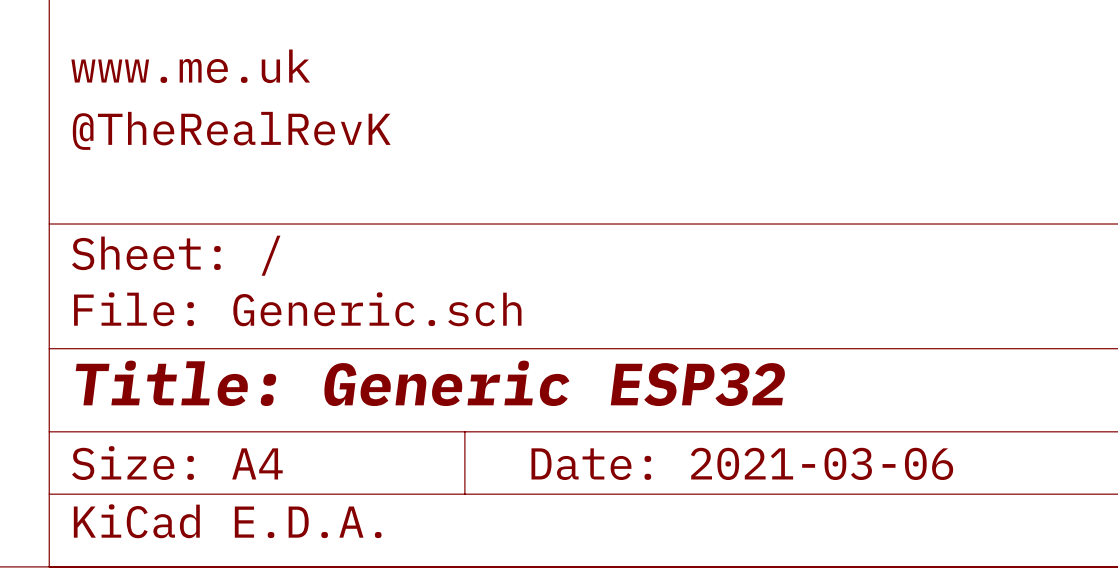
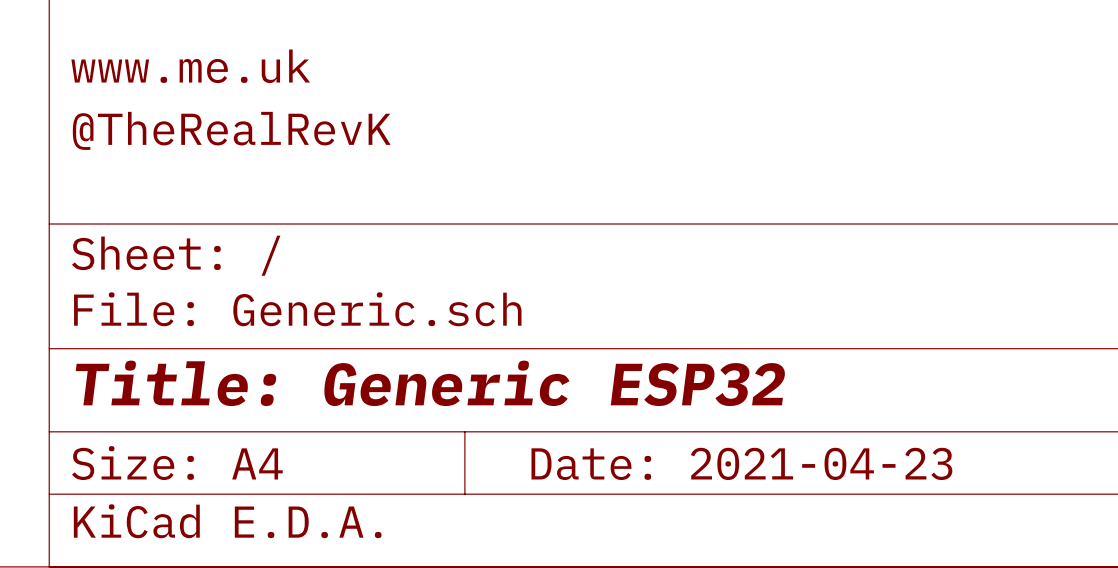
title block: Date: 2021-03-06 (742, 463) -> Date: 2021-04-23 (741, 463)

